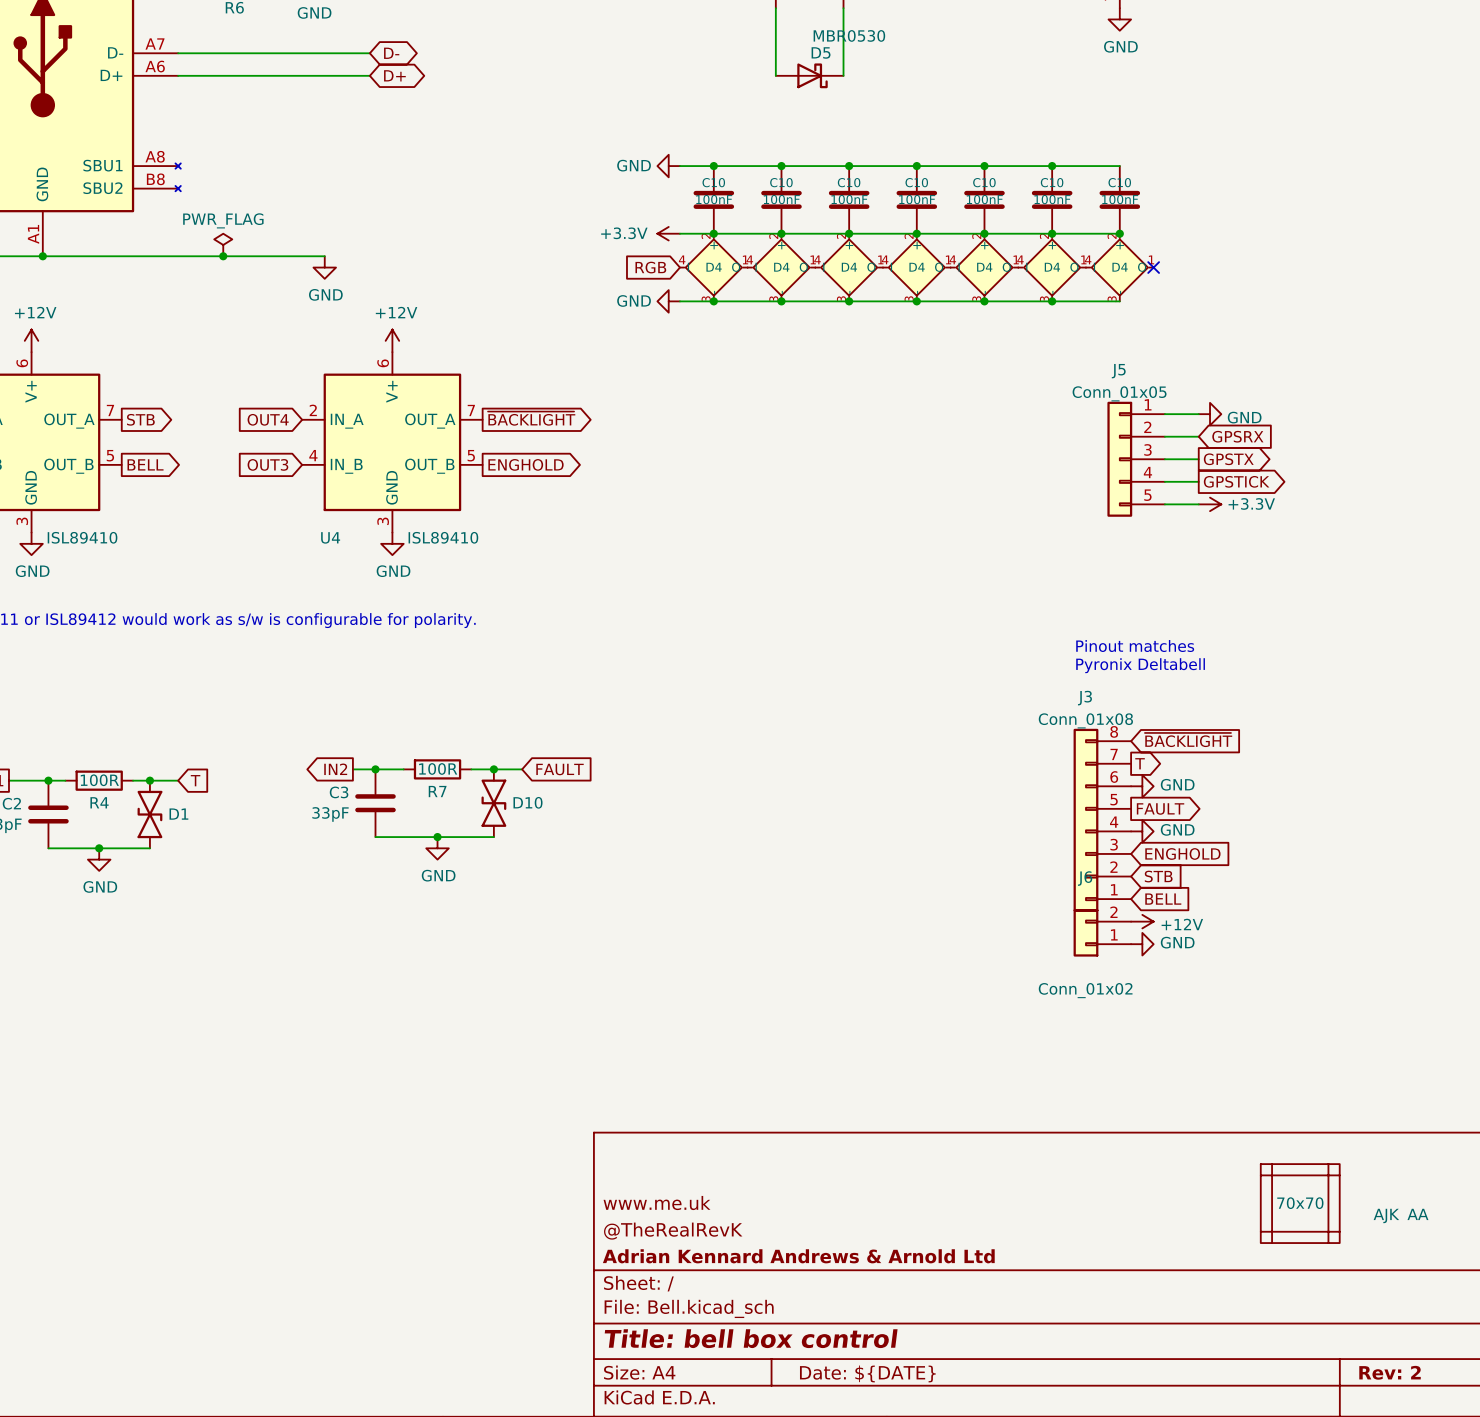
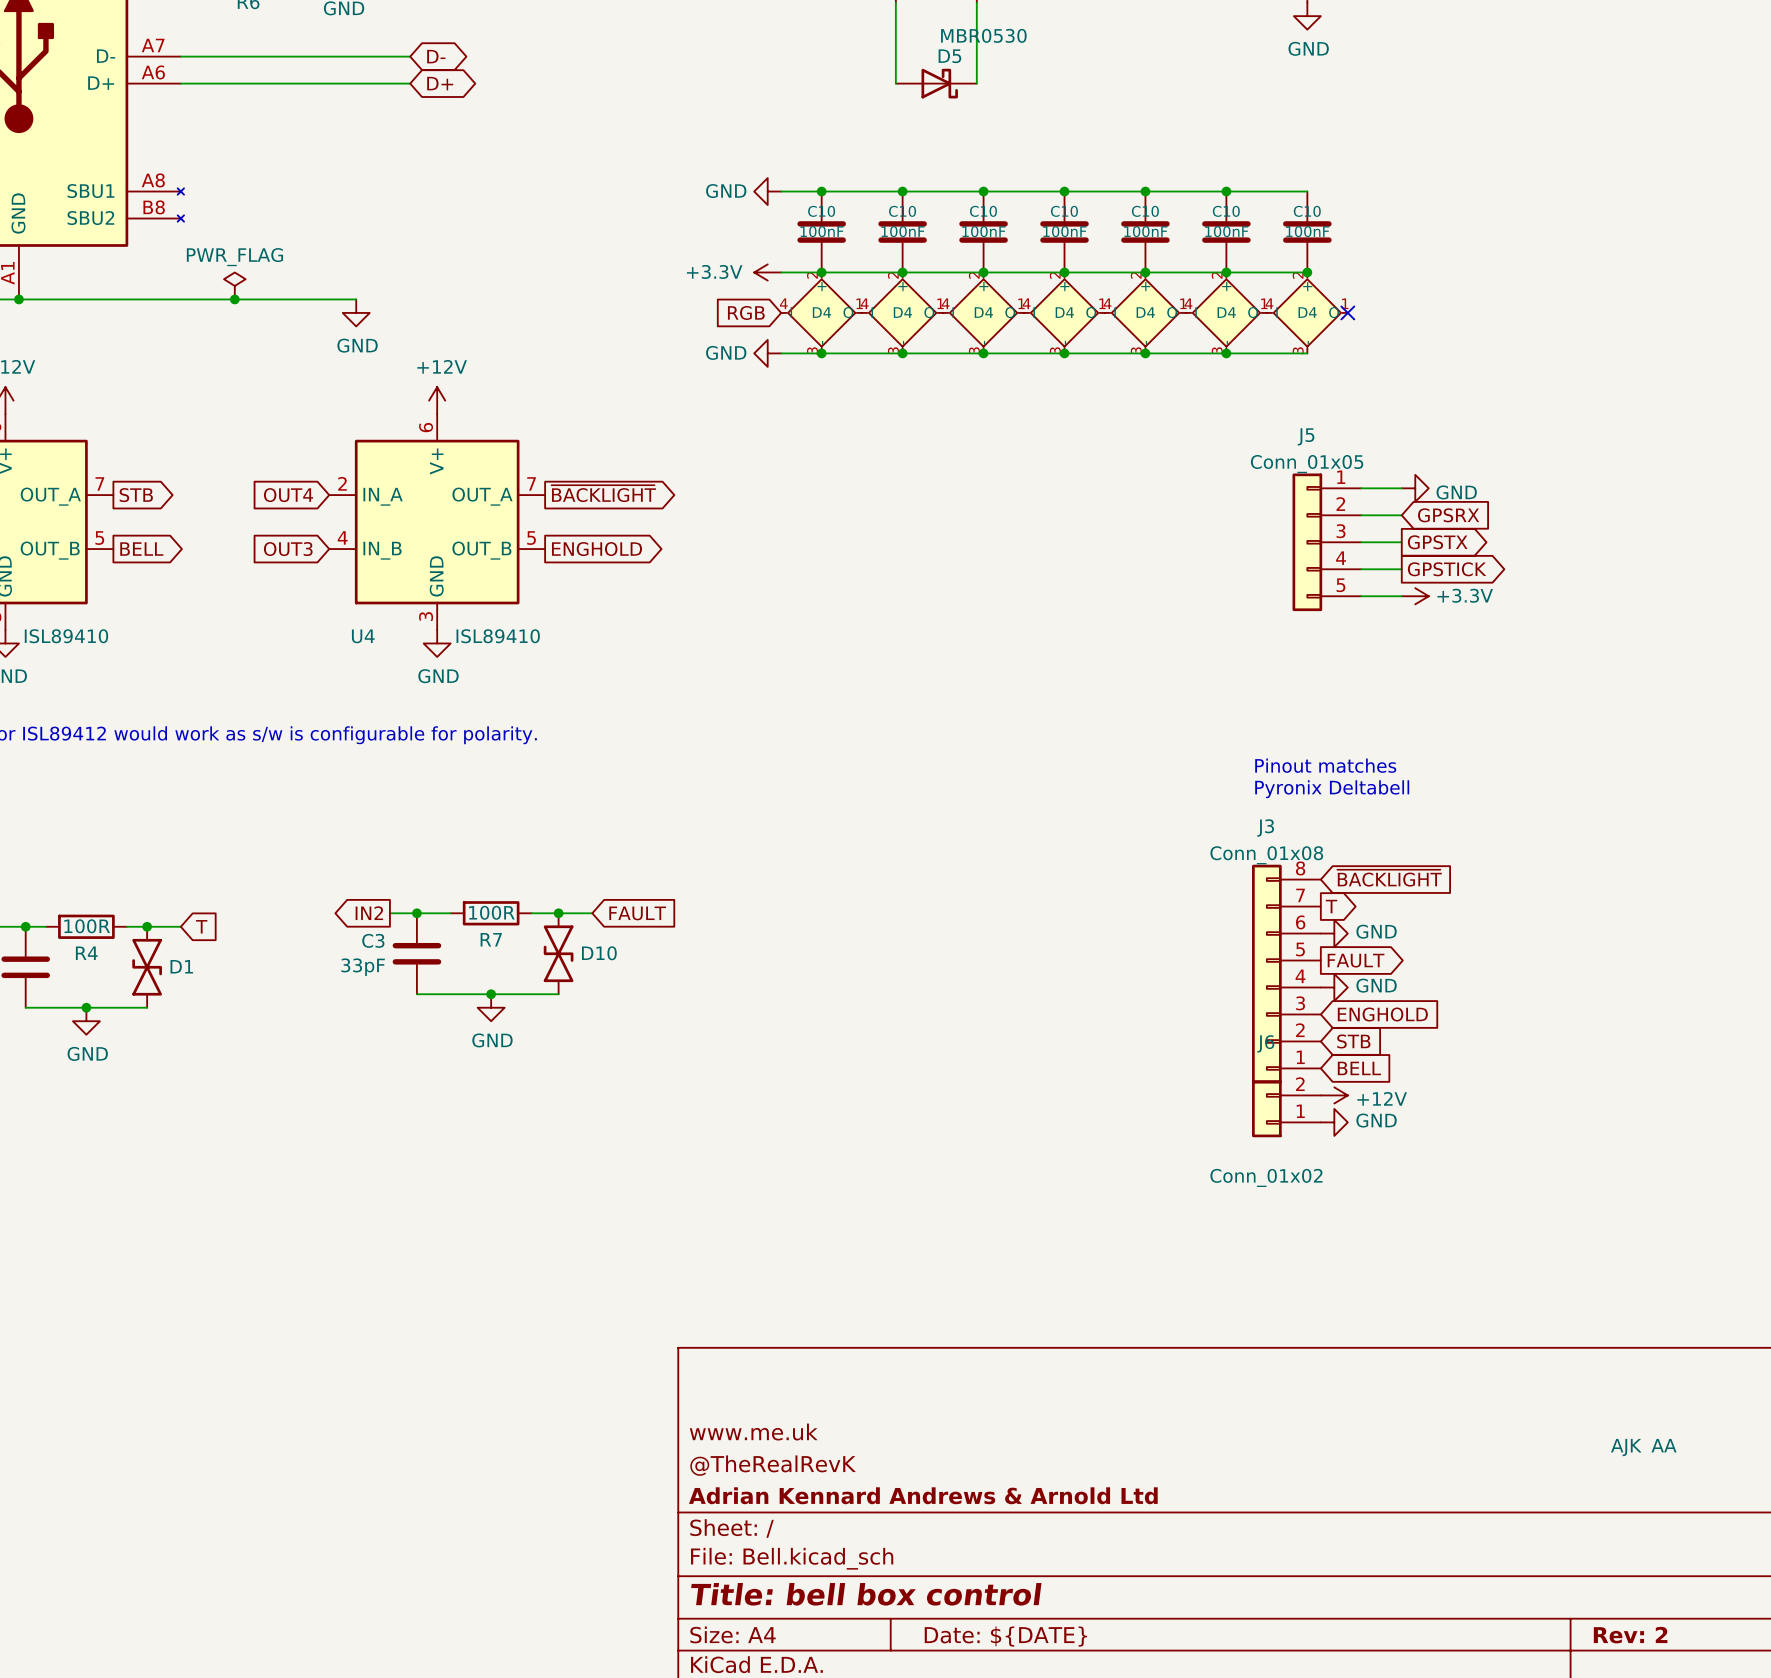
part: (1300, 1175) -> none
part: (1272, 1203) -> none
part: 70x70 (1300, 1203) -> none
part: (1328, 1203) -> none
part: (1300, 1231) -> none

